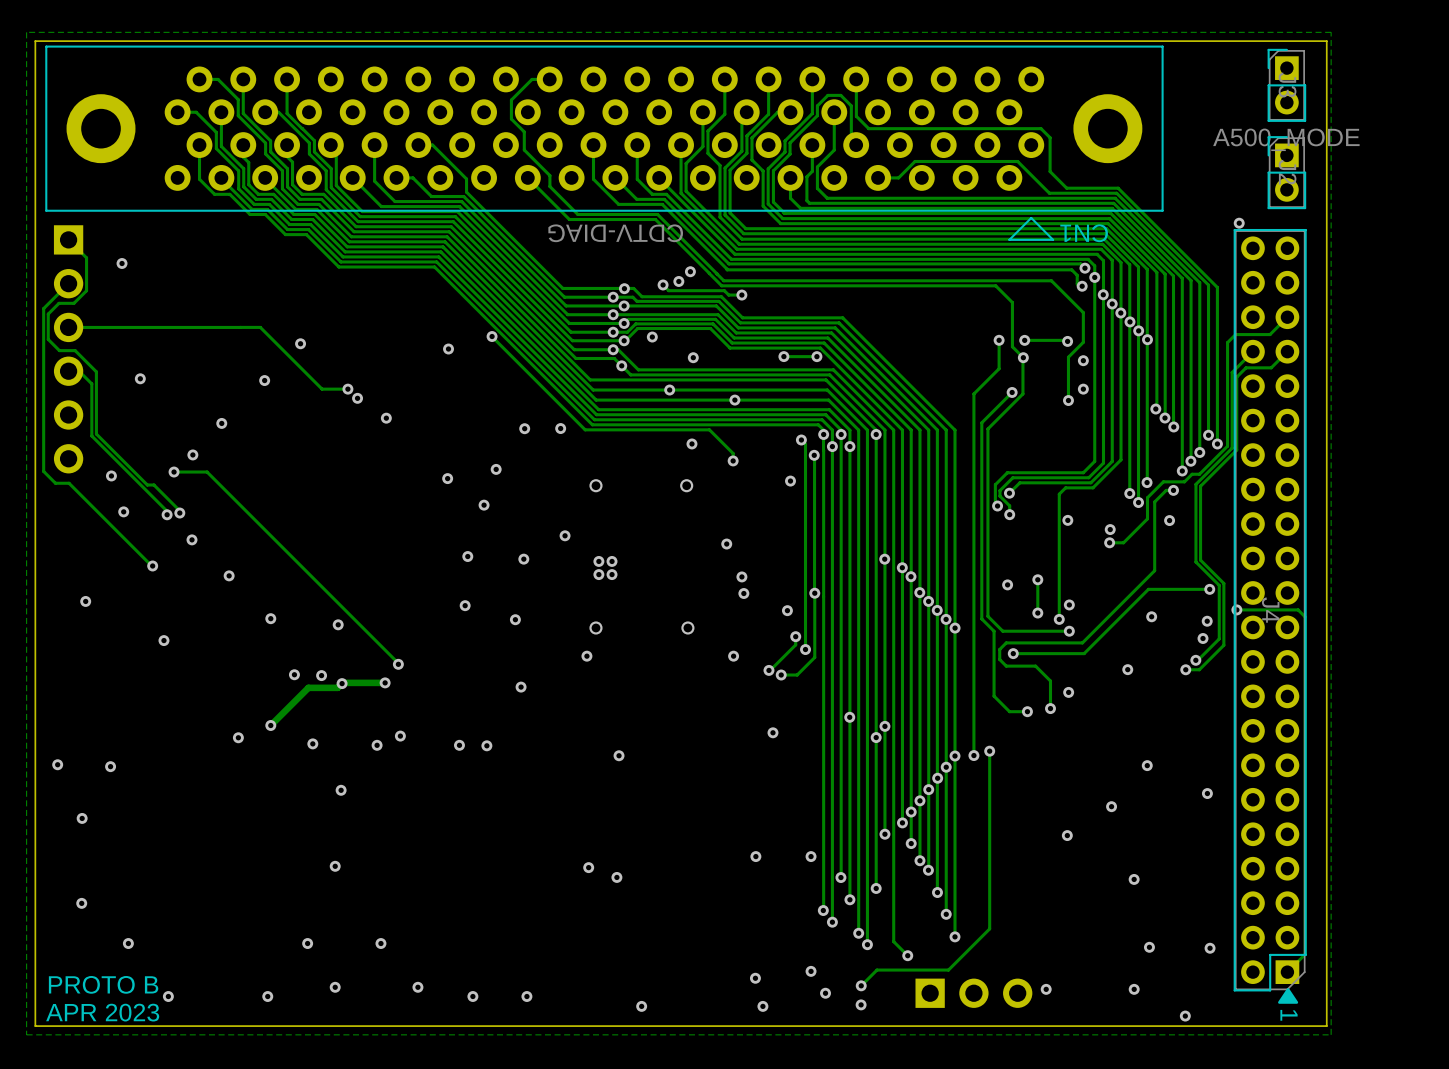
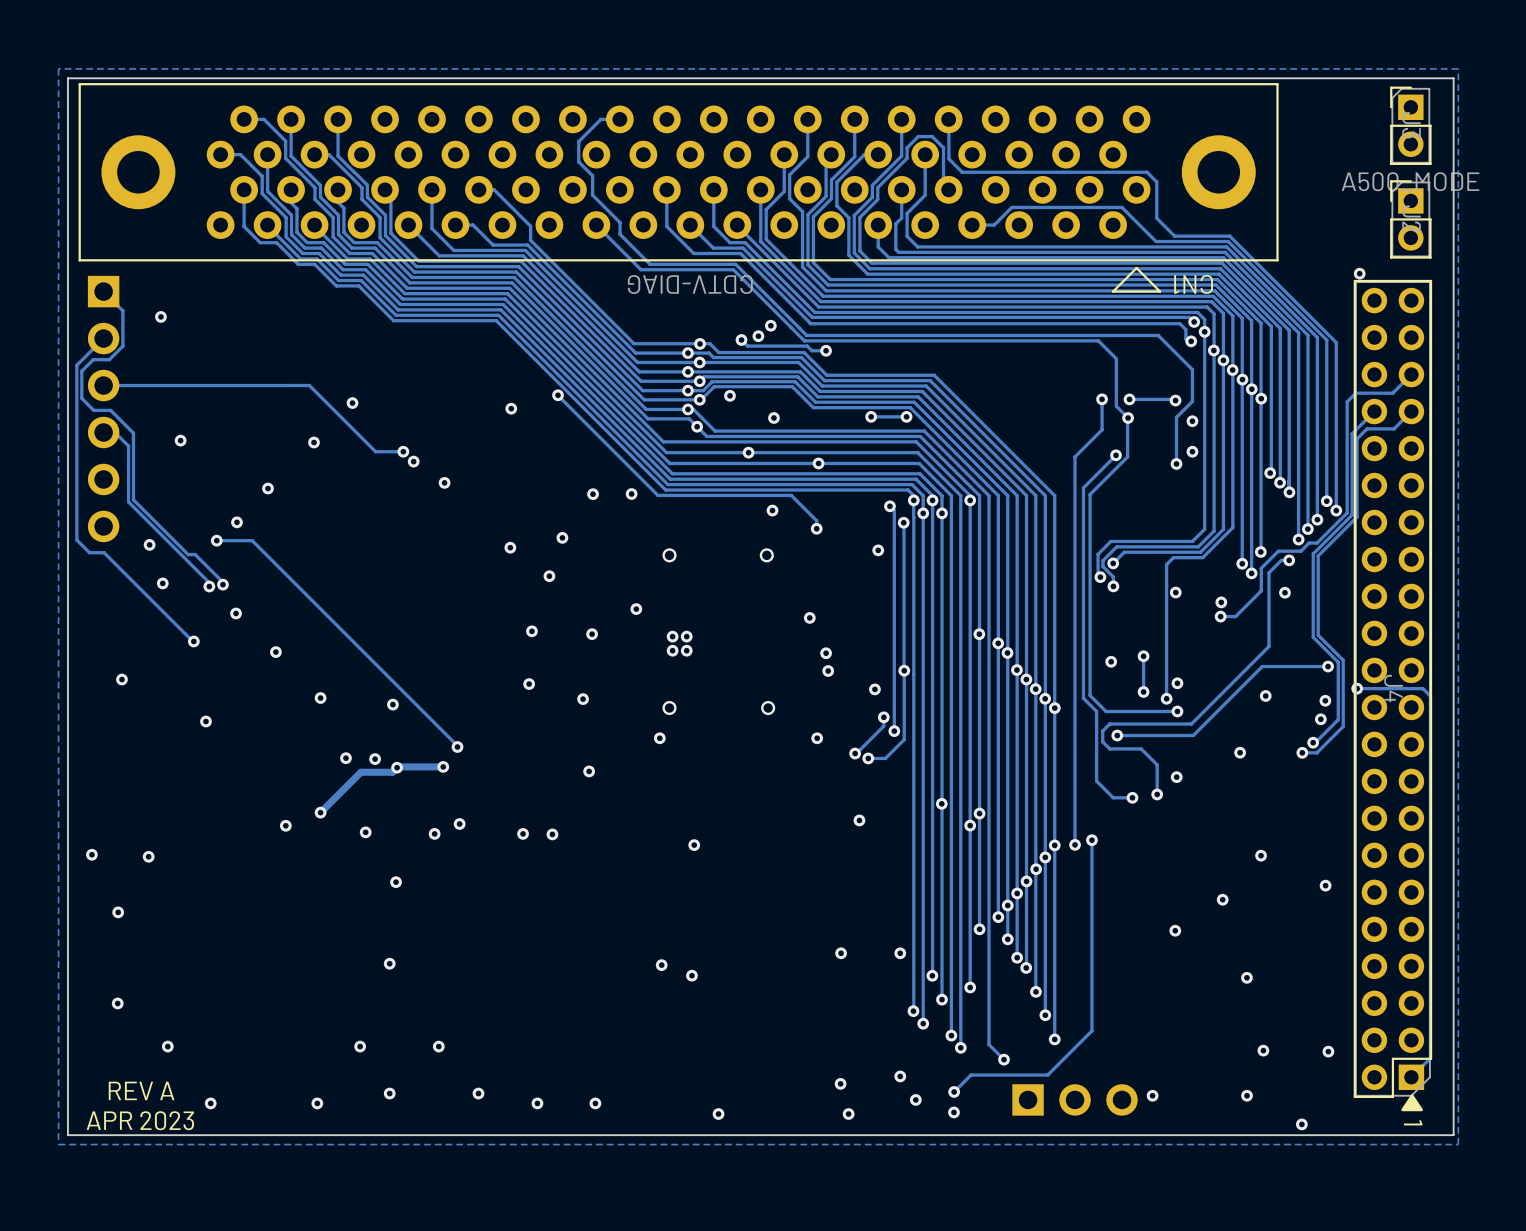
text: PROTO B (103, 984) -> REV A (141, 1090)

